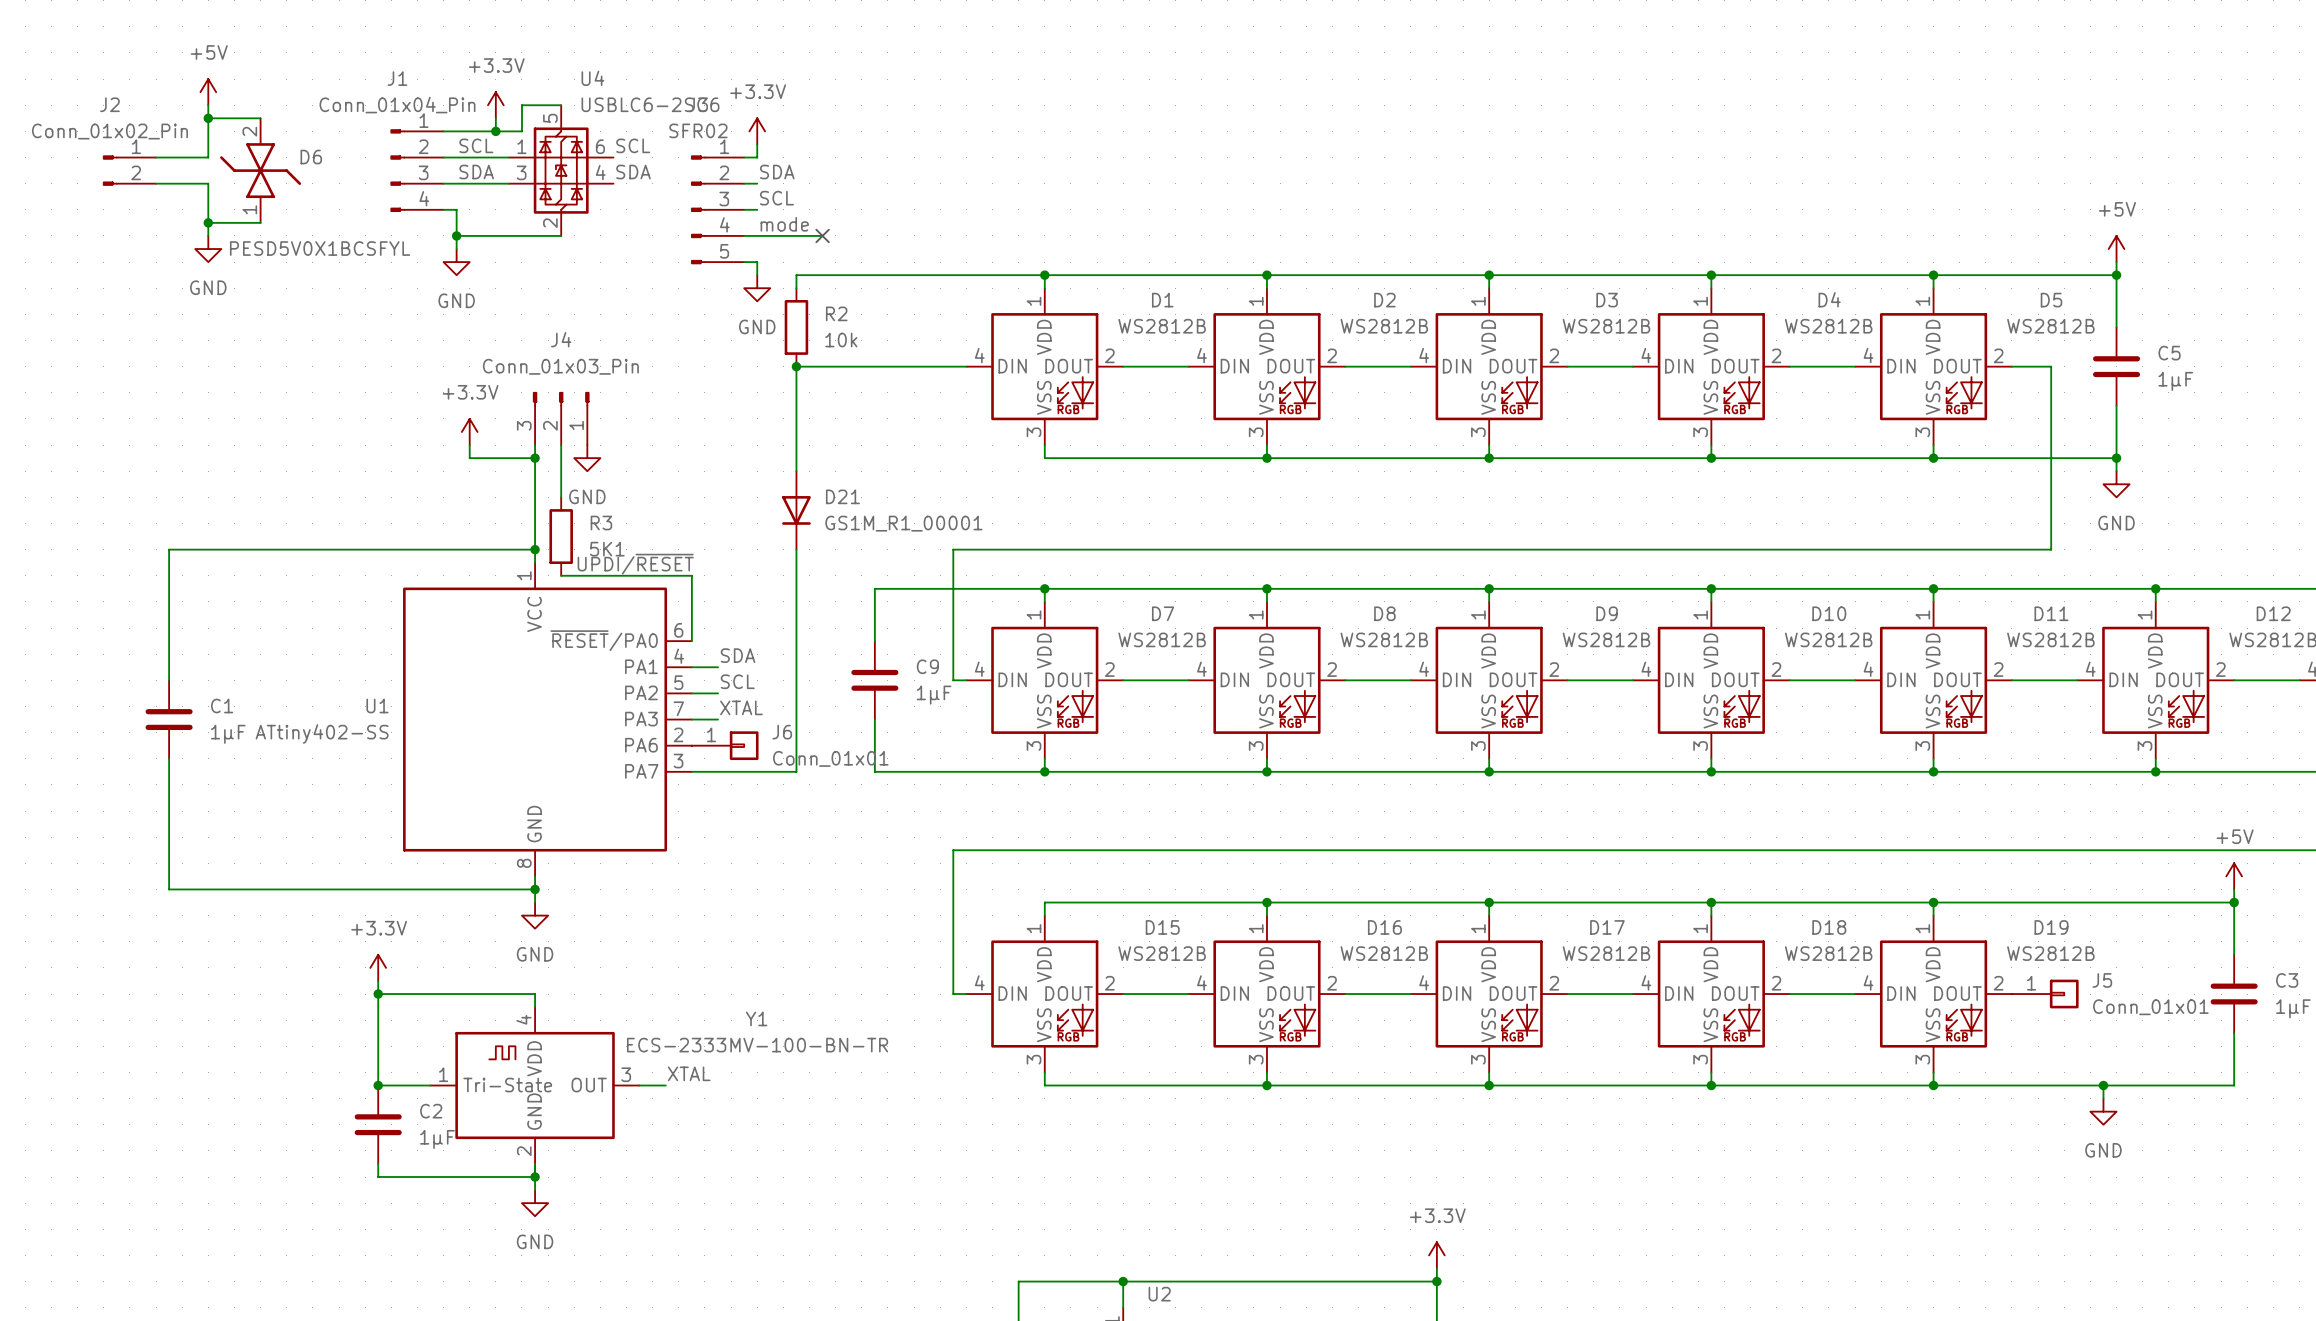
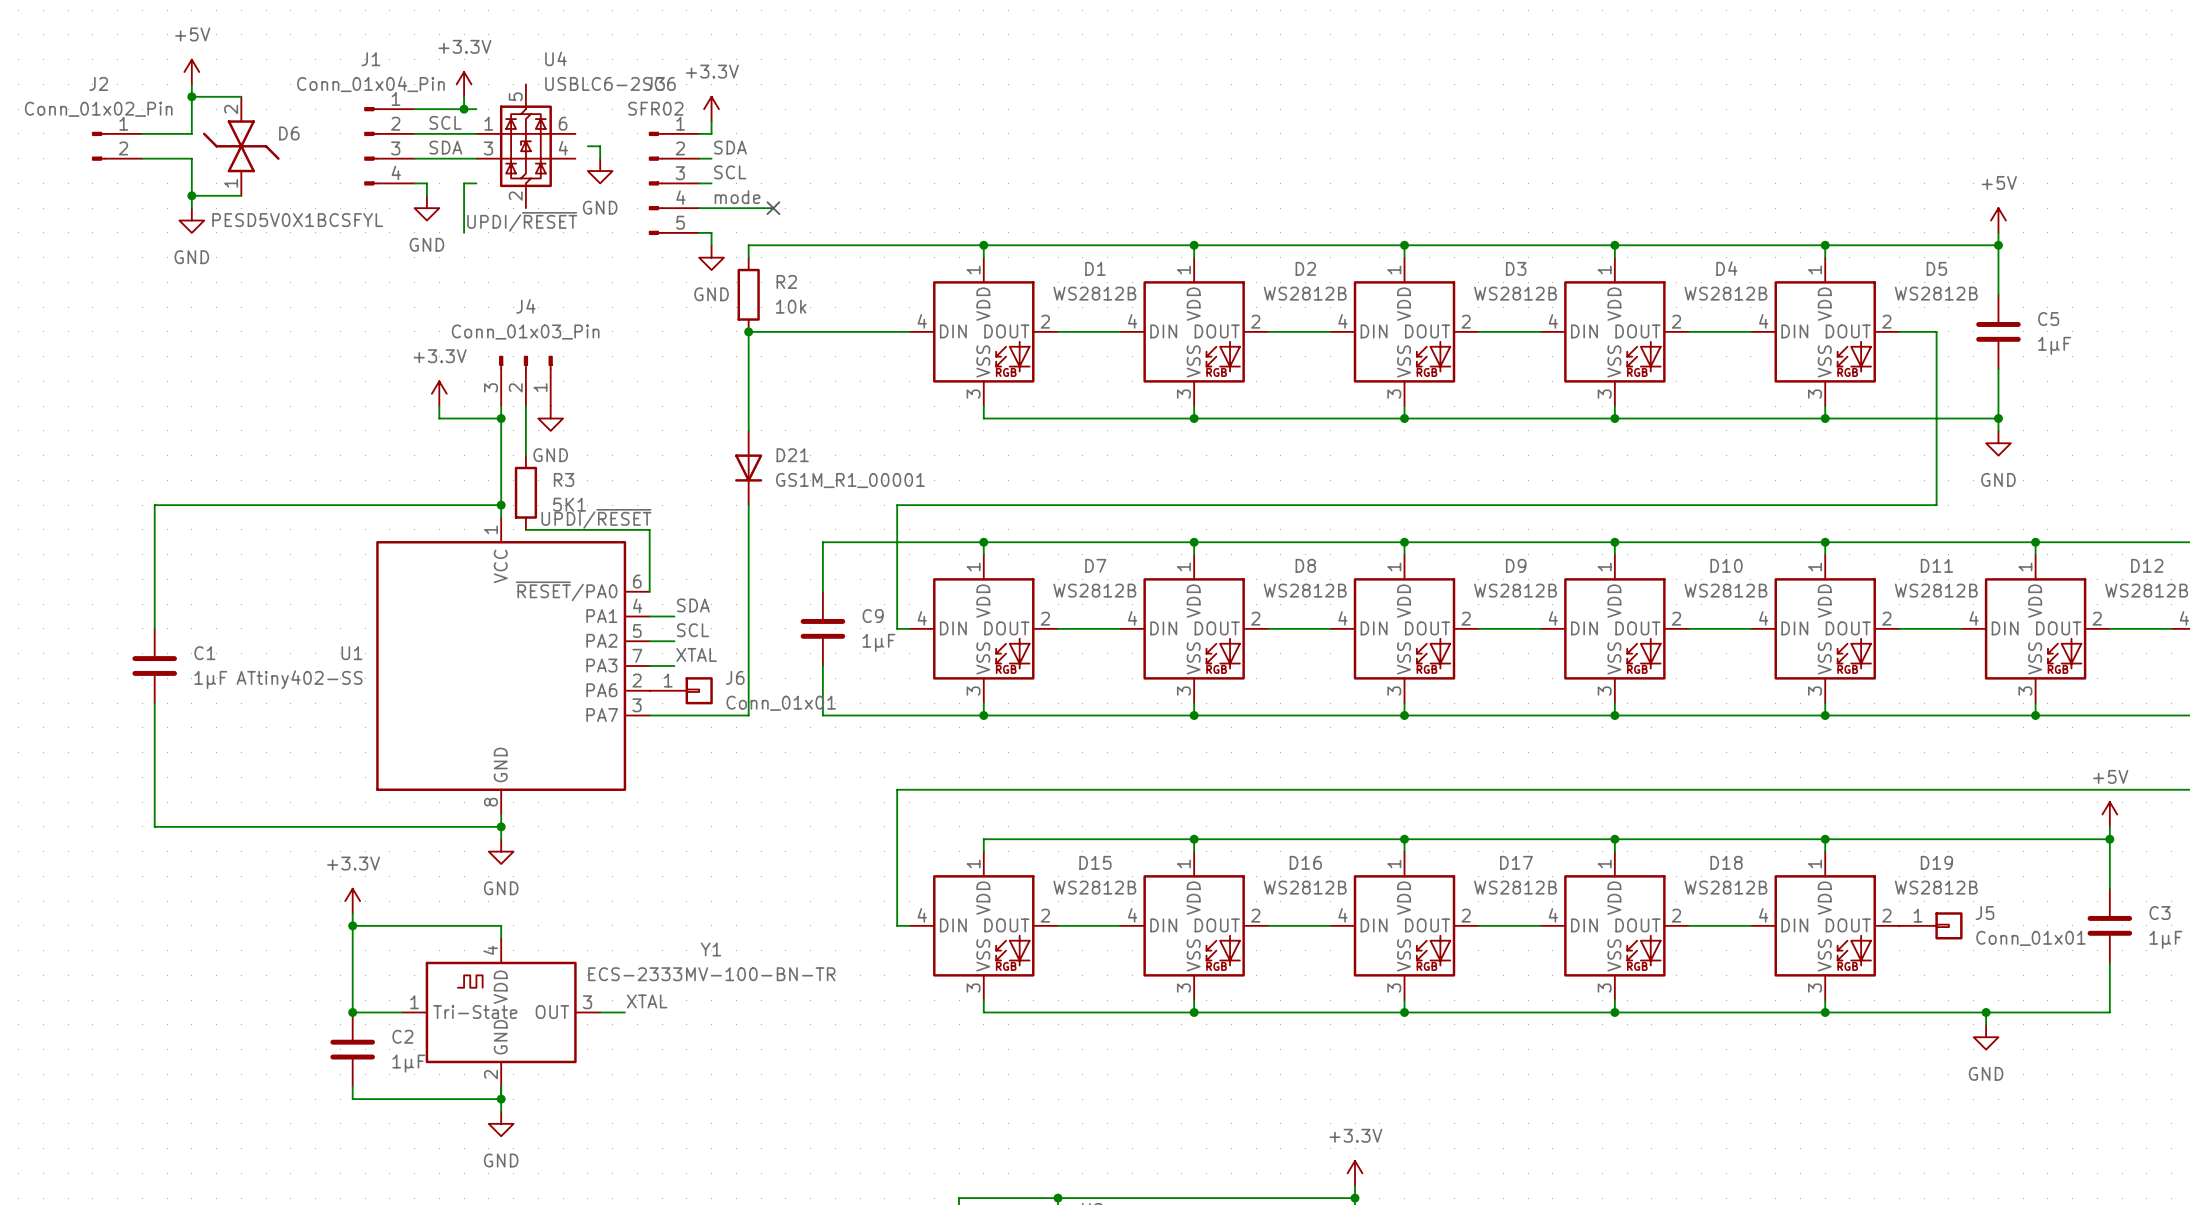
wire: (561, 105) (521, 105) (521, 131) (508, 131) -> none
label: SCL (633, 145) -> none
wire: none -> (587, 146) (600, 146) (600, 158)
label: SDA (633, 172) -> none
power symbol: none -> GND (600, 171)
wire: none -> (476, 183) (464, 183) (464, 232)
wire: (456, 235) (561, 235) -> none
junction: (456, 235) -> none
label: none -> UPDI/~{RESET} (522, 221)
power symbol position: GND (456, 262) -> GND (426, 208)

